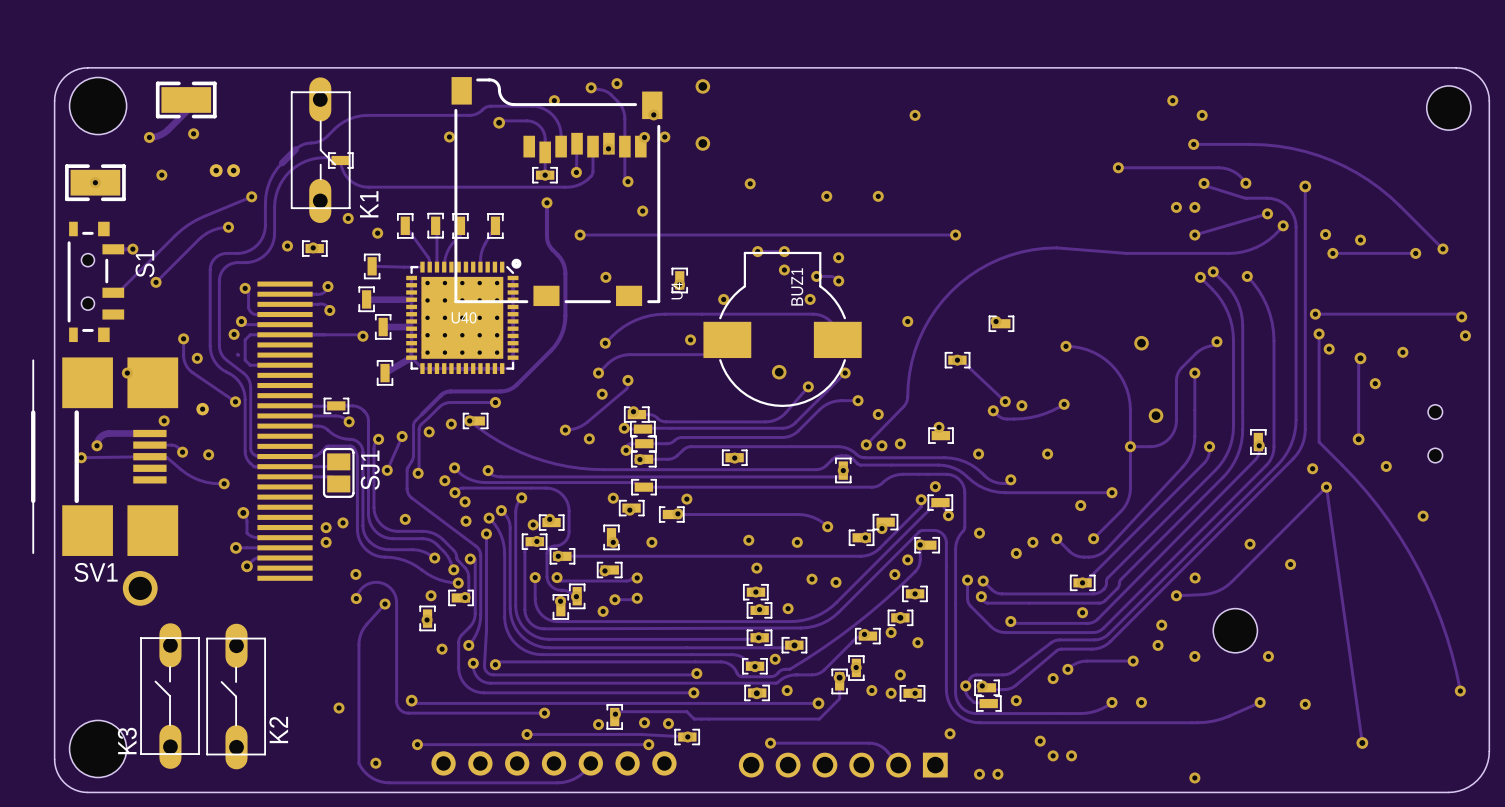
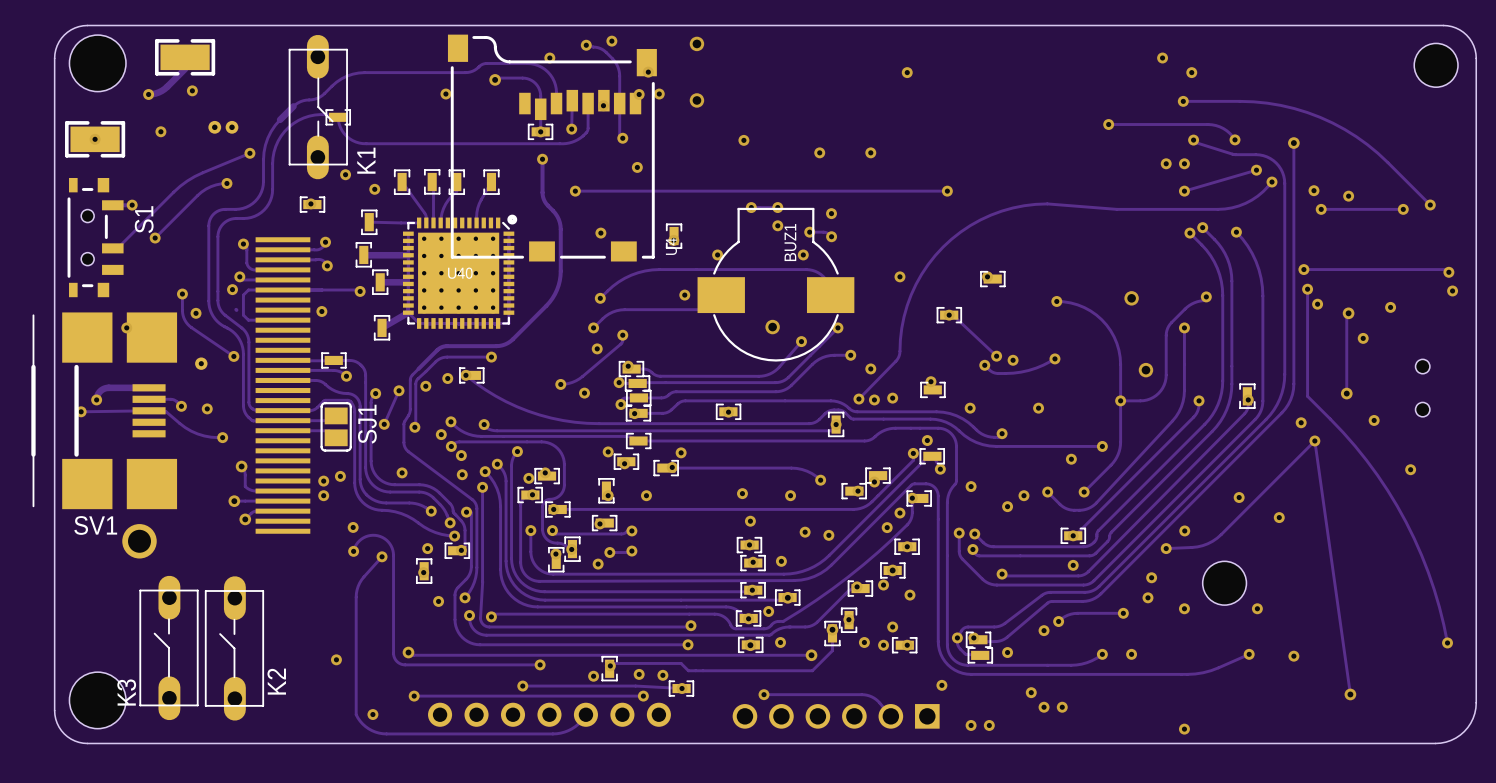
via: (287, 246) -> none
via: none -> (321, 311)
via: (164, 420) -> none

